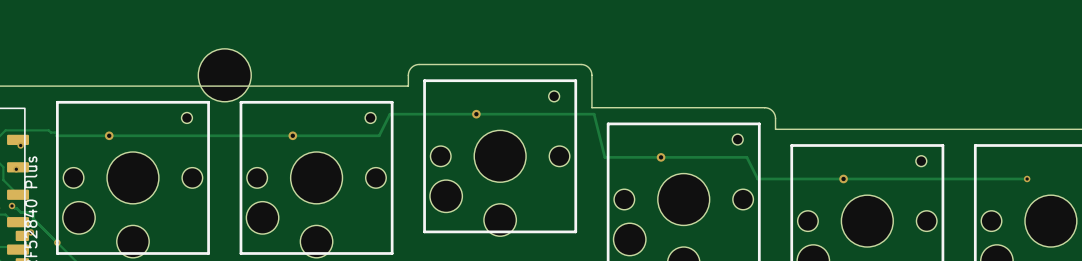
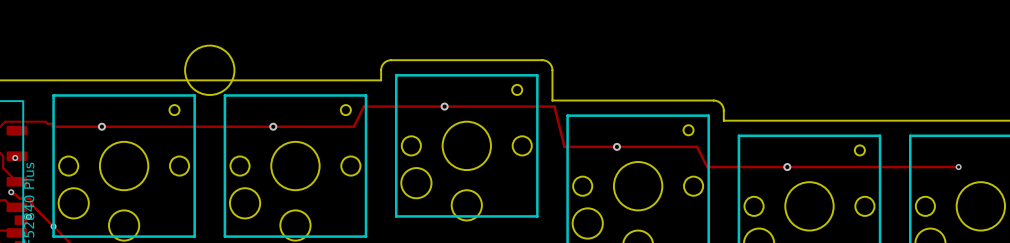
via: (20, 145) -> none

